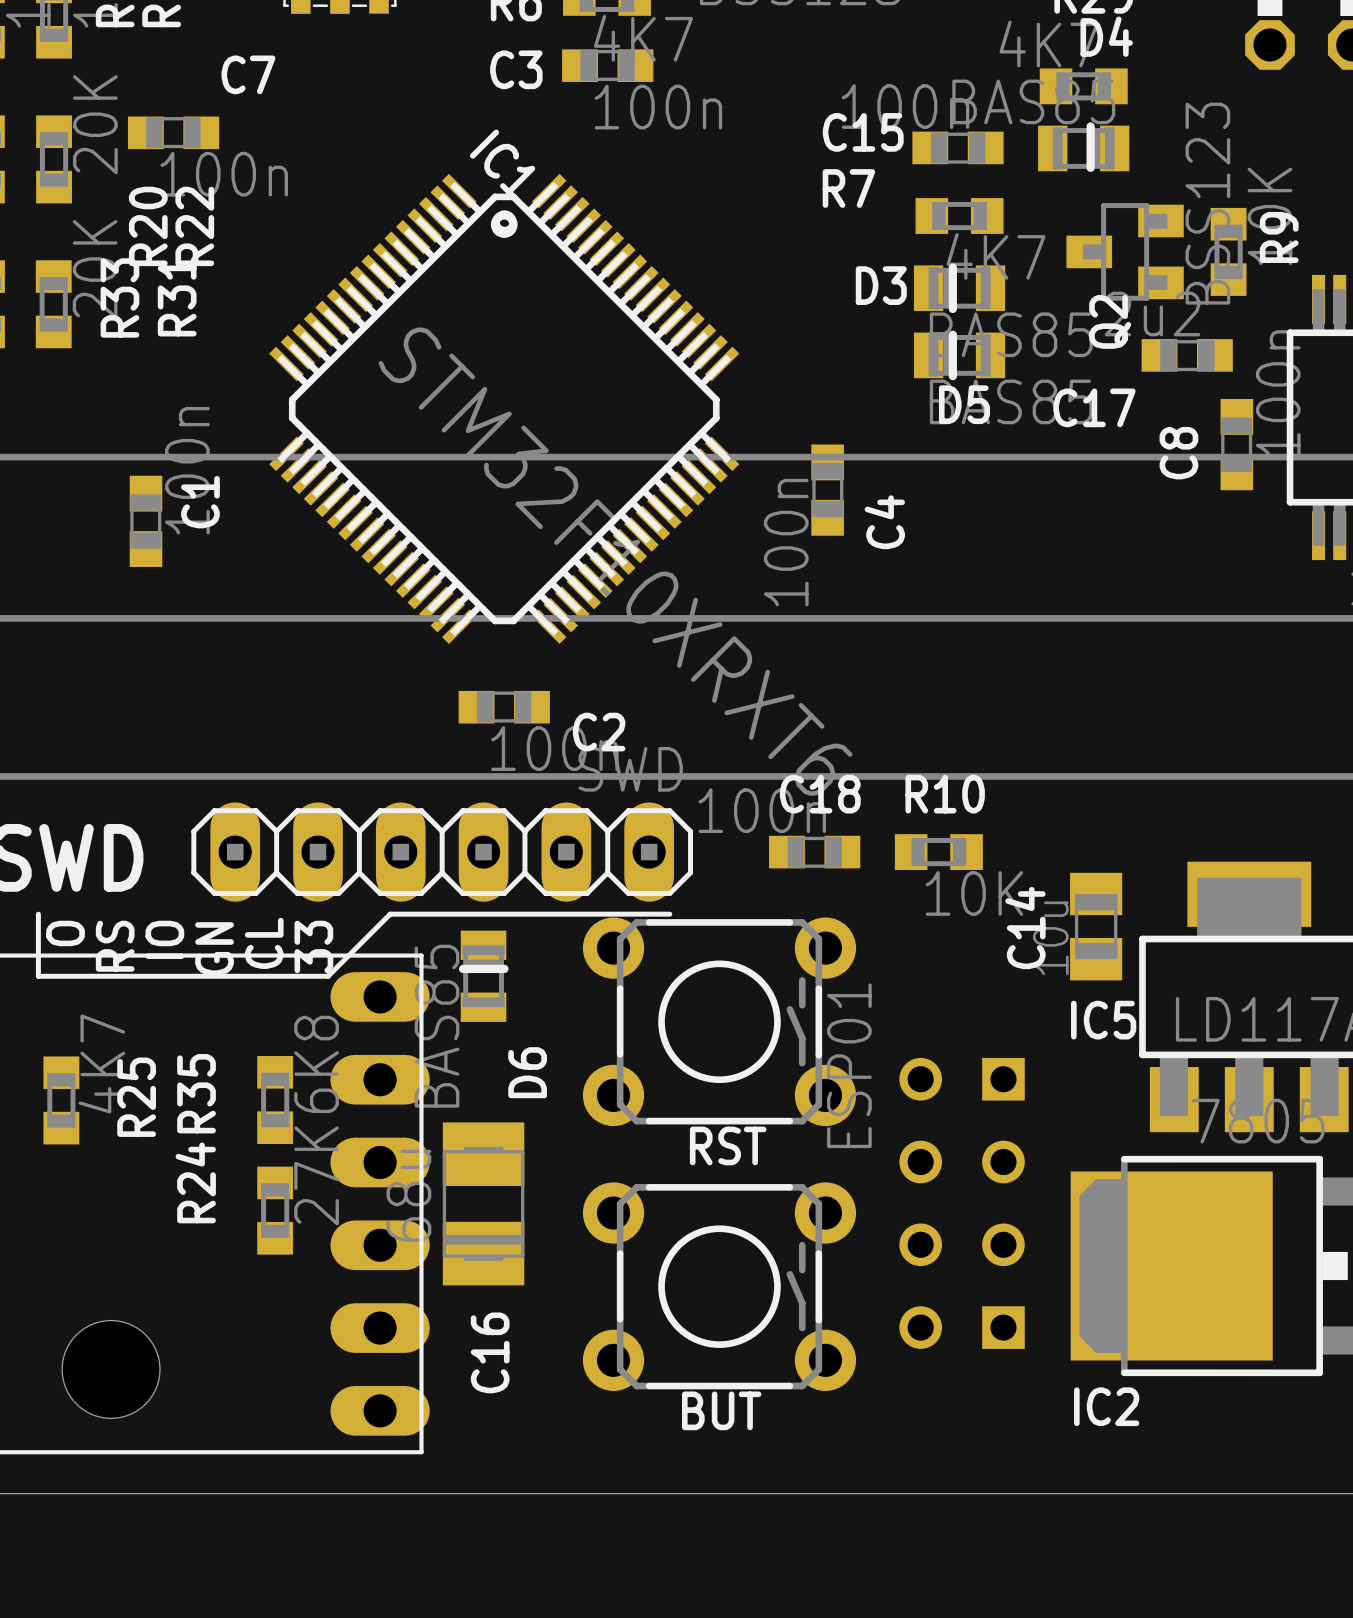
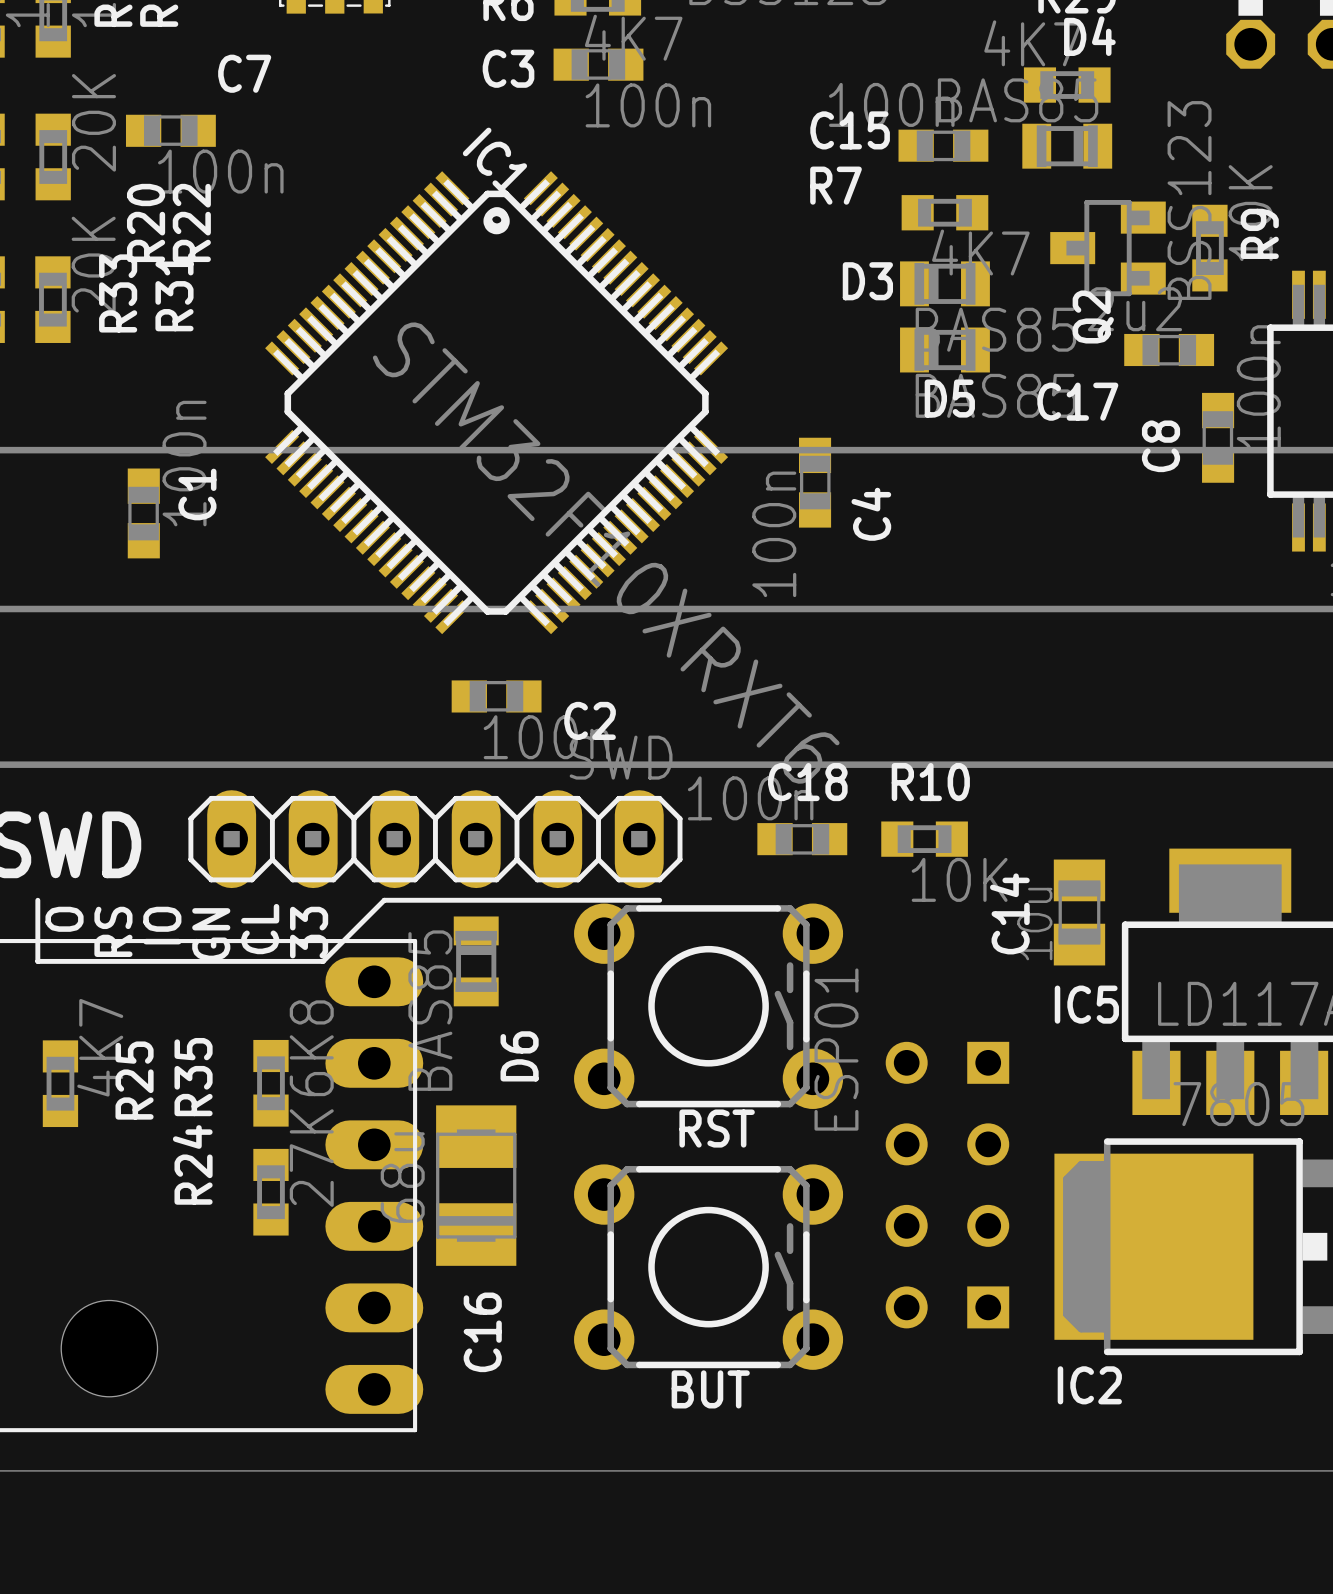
line: (1090, 126) (1090, 167) -> none
line: (952, 267) (952, 308) -> none
line: (952, 334) (952, 376) -> none
line: (463, 968) (504, 968) -> none

